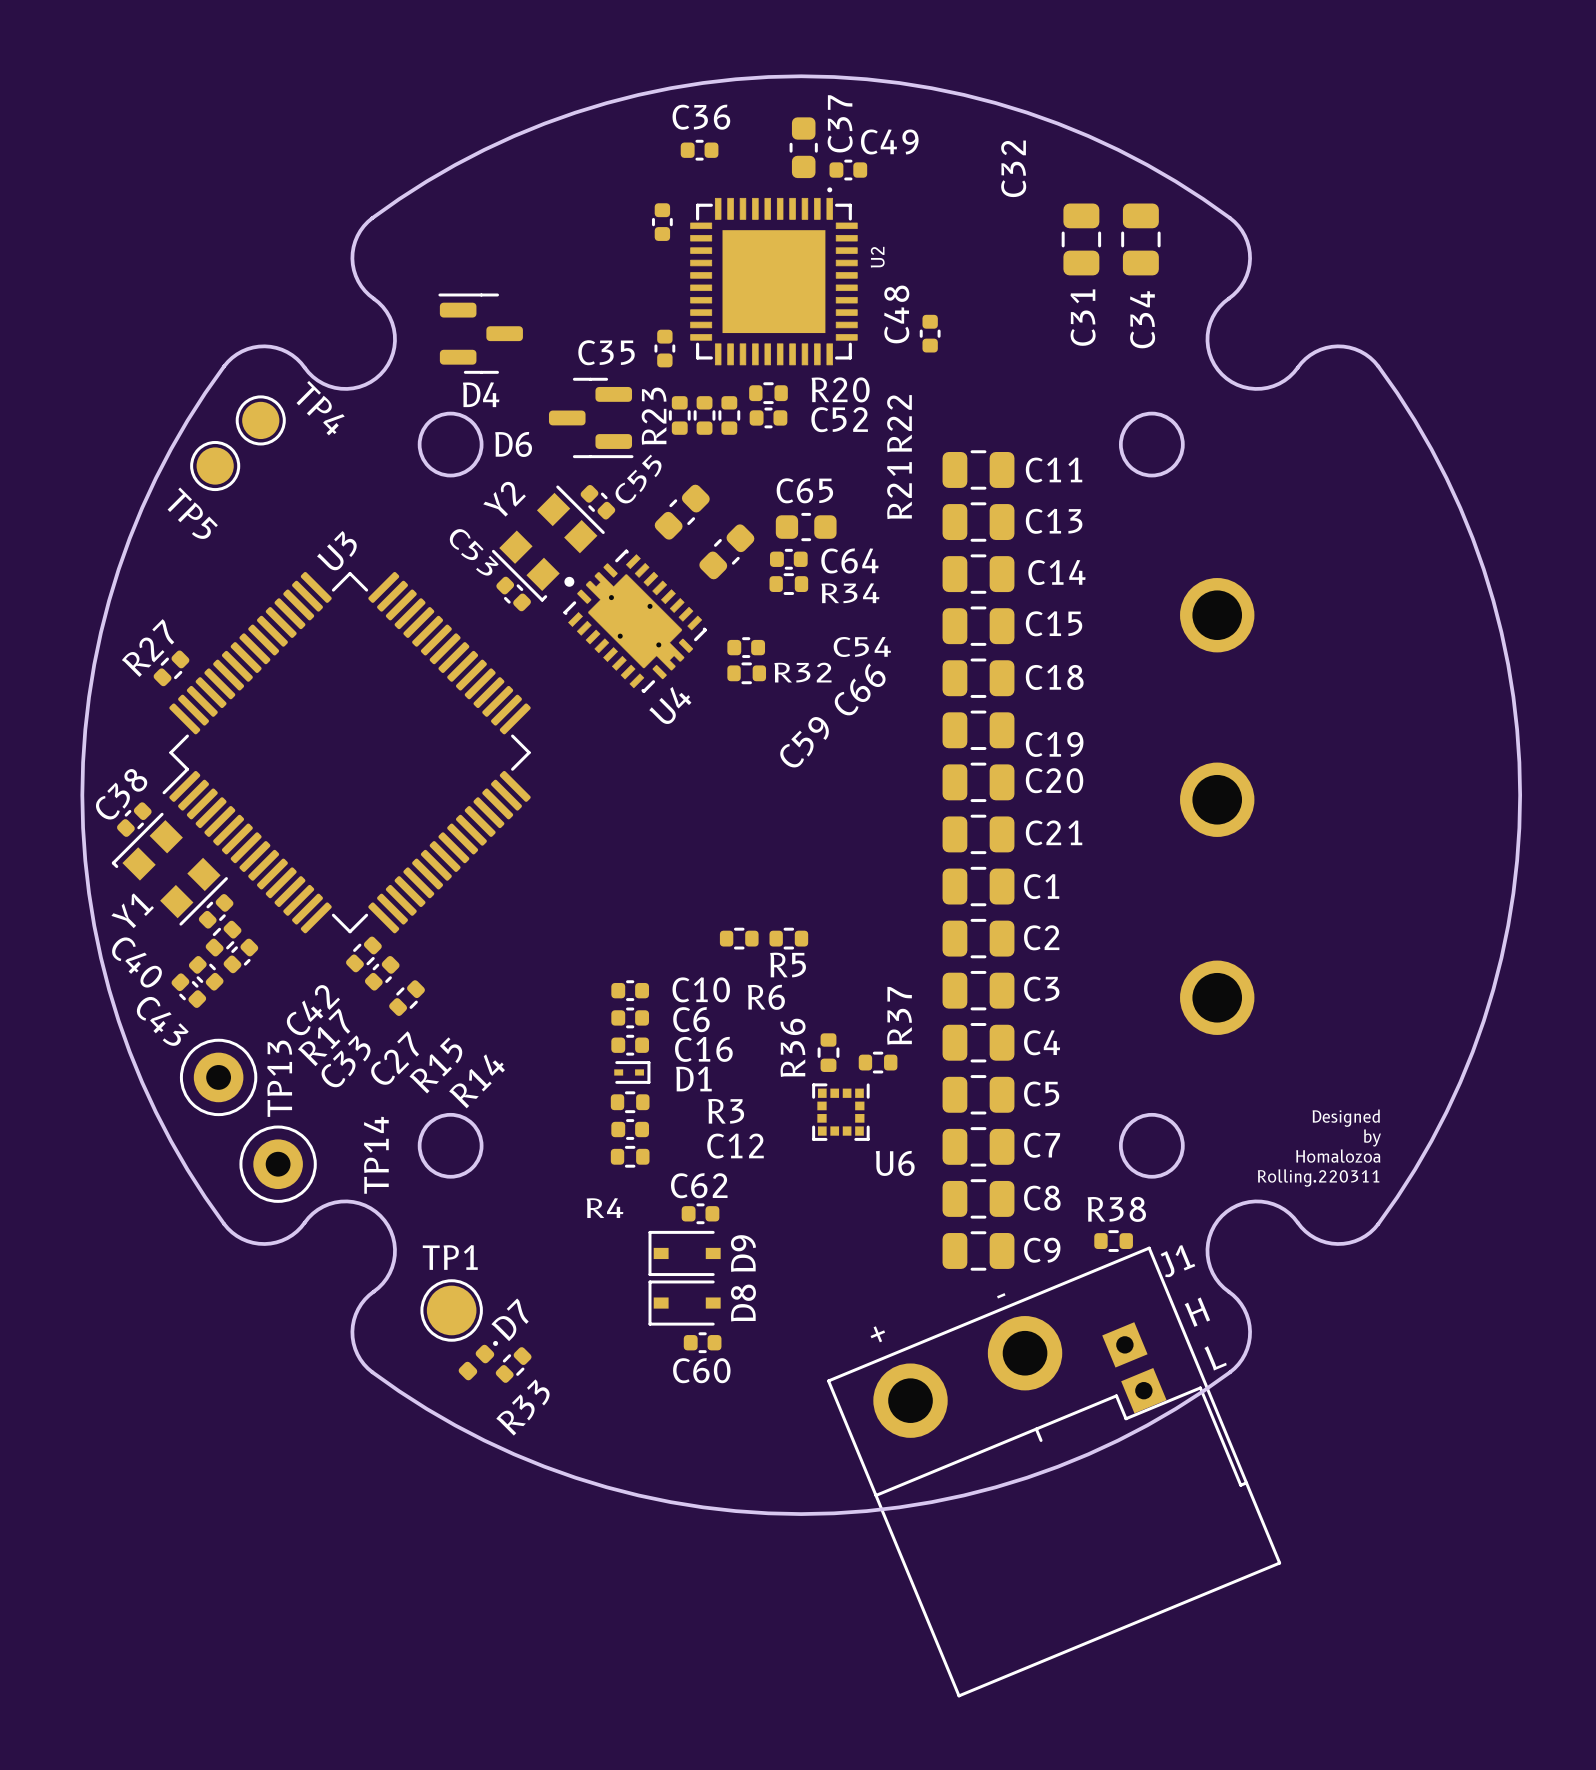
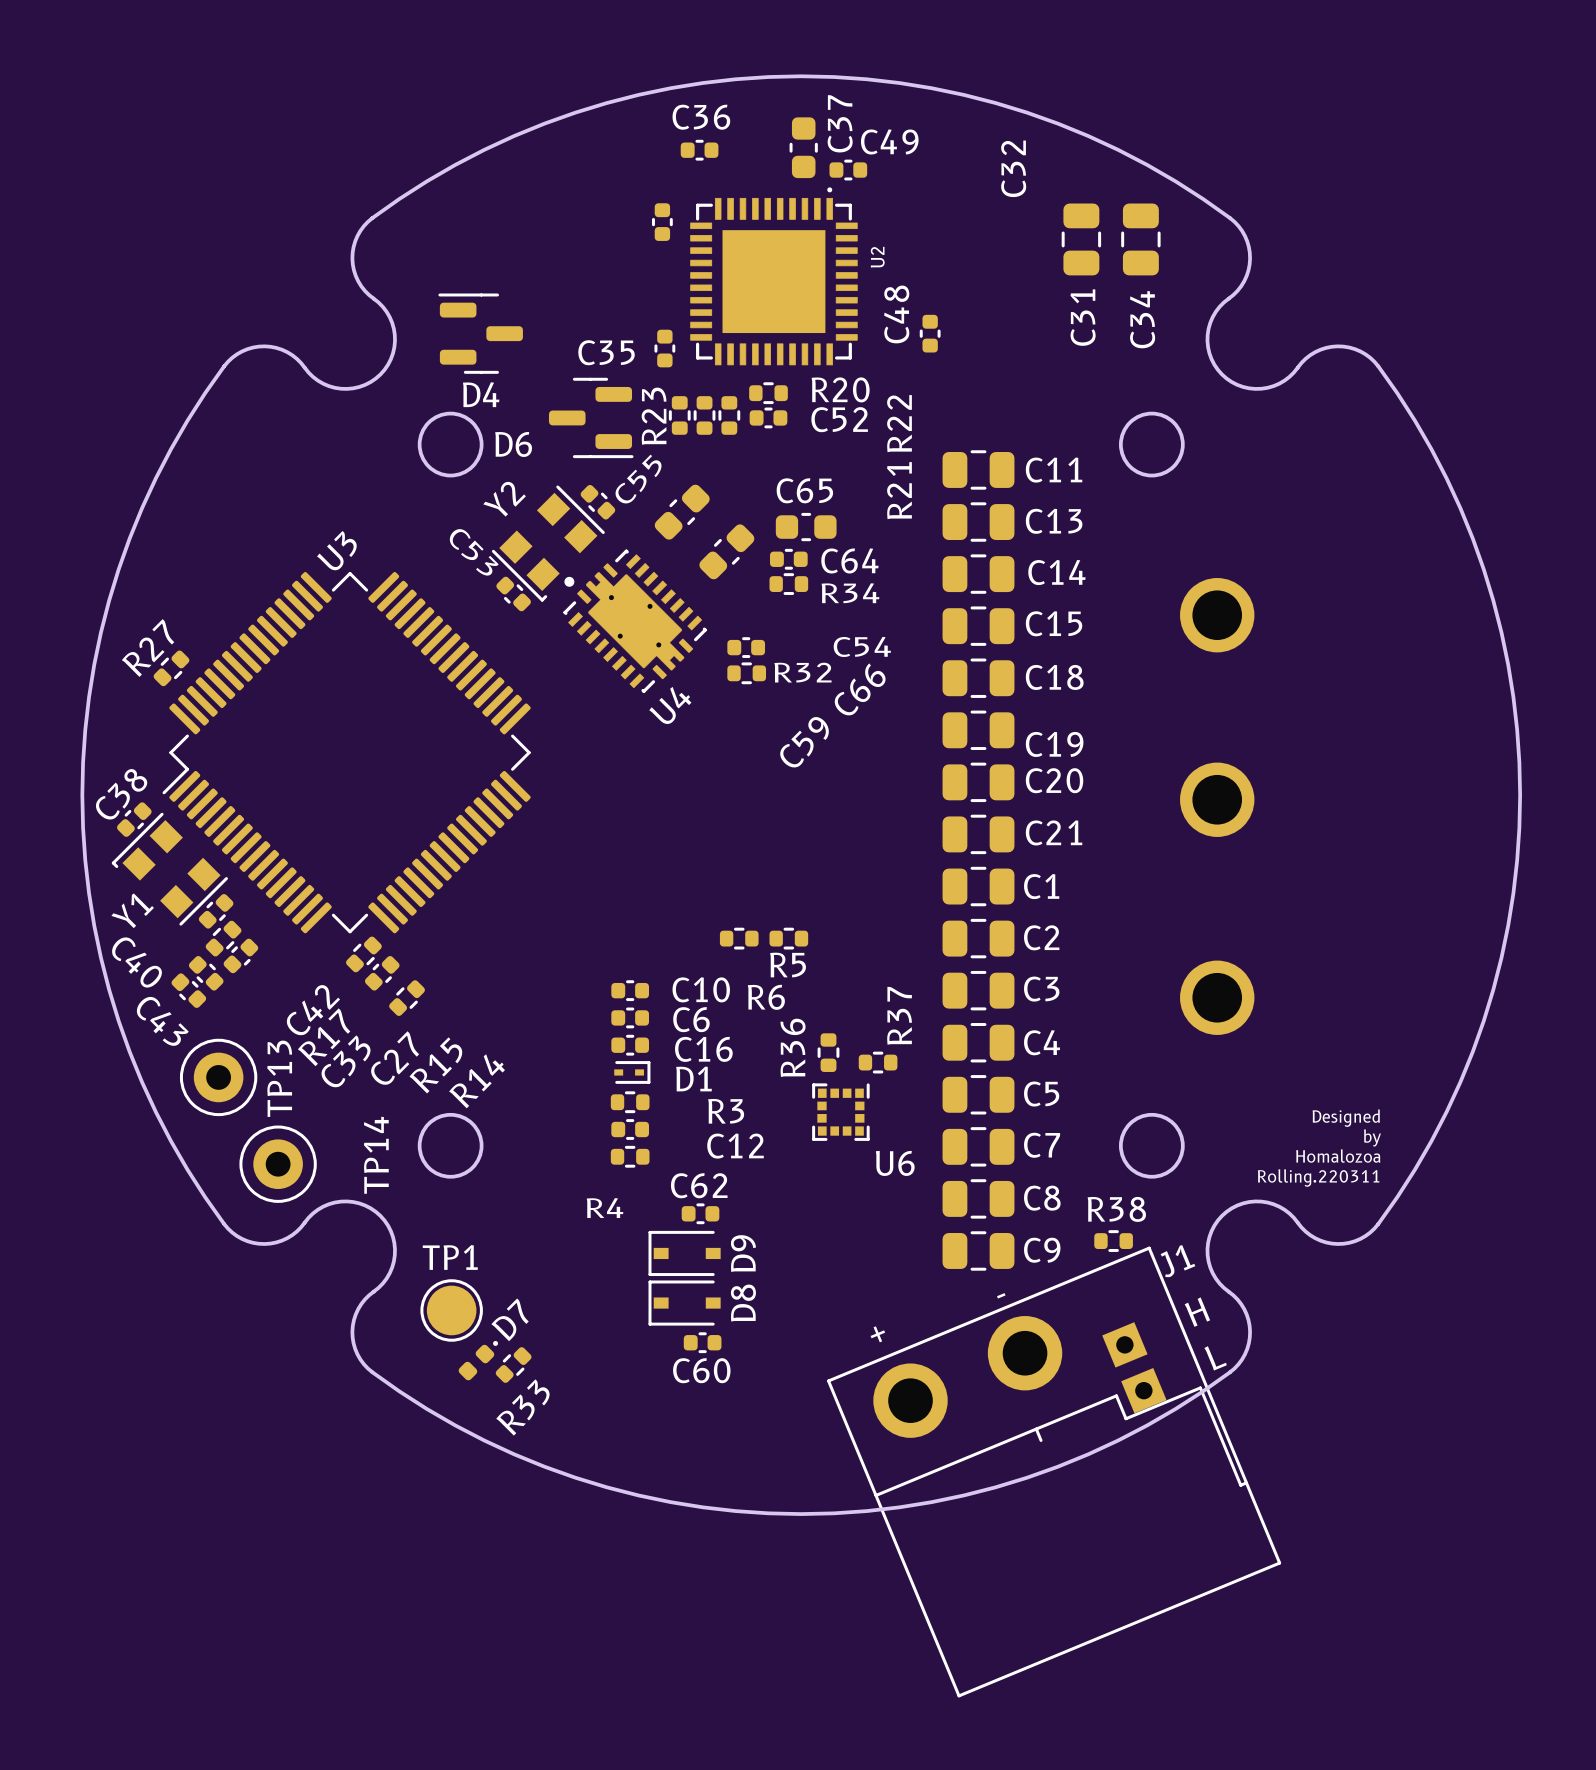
TP4: (260, 420) -> none
TP5: (215, 466) -> none

